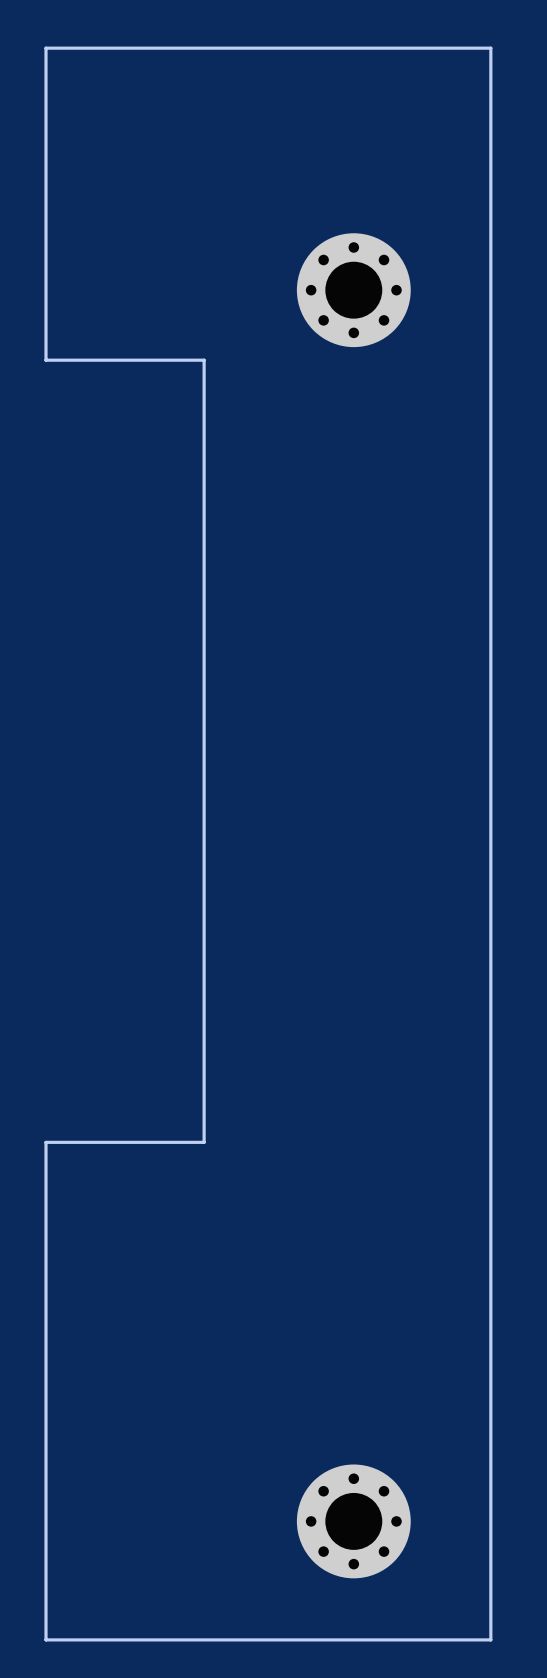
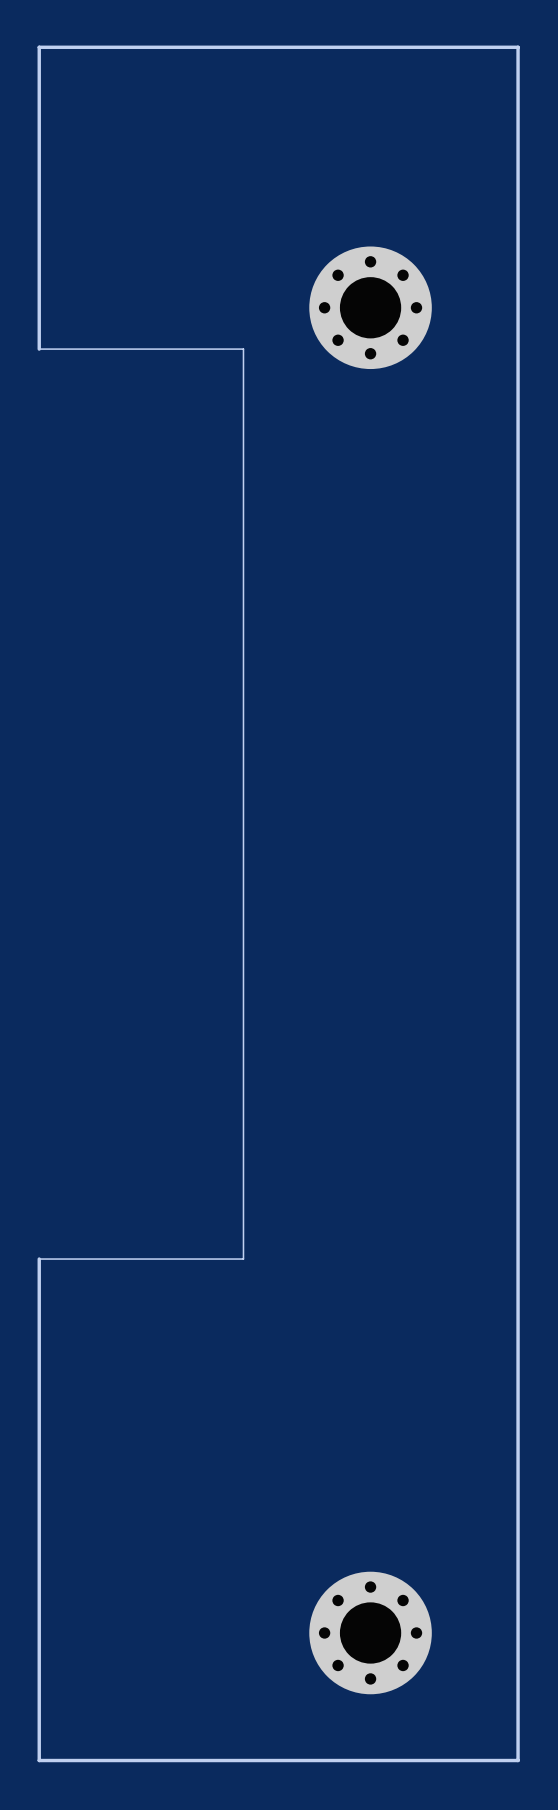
board edge: (46, 328) (46, 360) (204, 360) (204, 1142) (46, 1142) (46, 1173) -> (39, 349) (243, 349) (243, 1259) (39, 1259)

